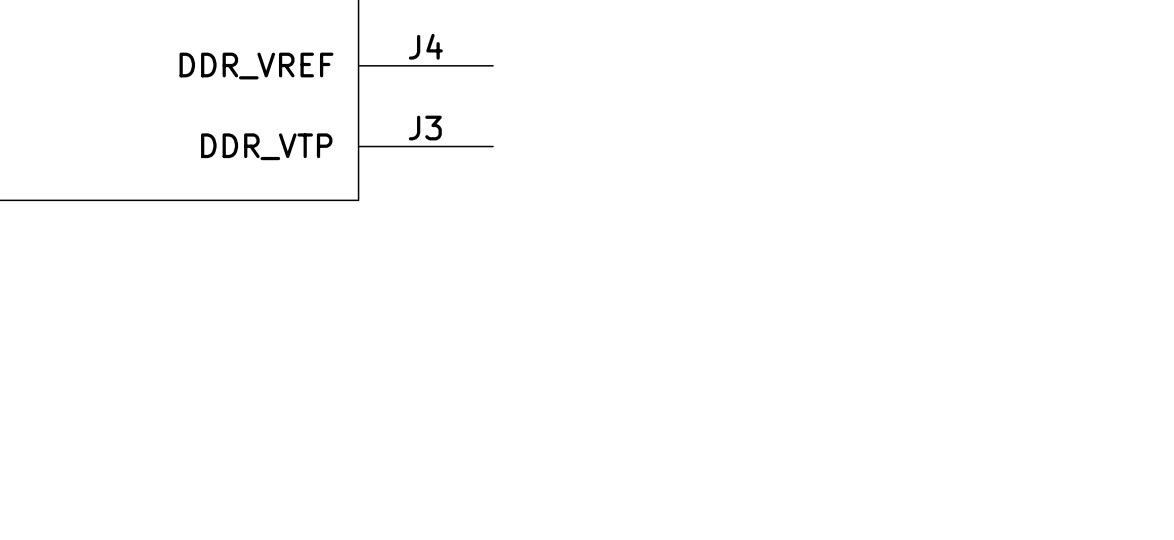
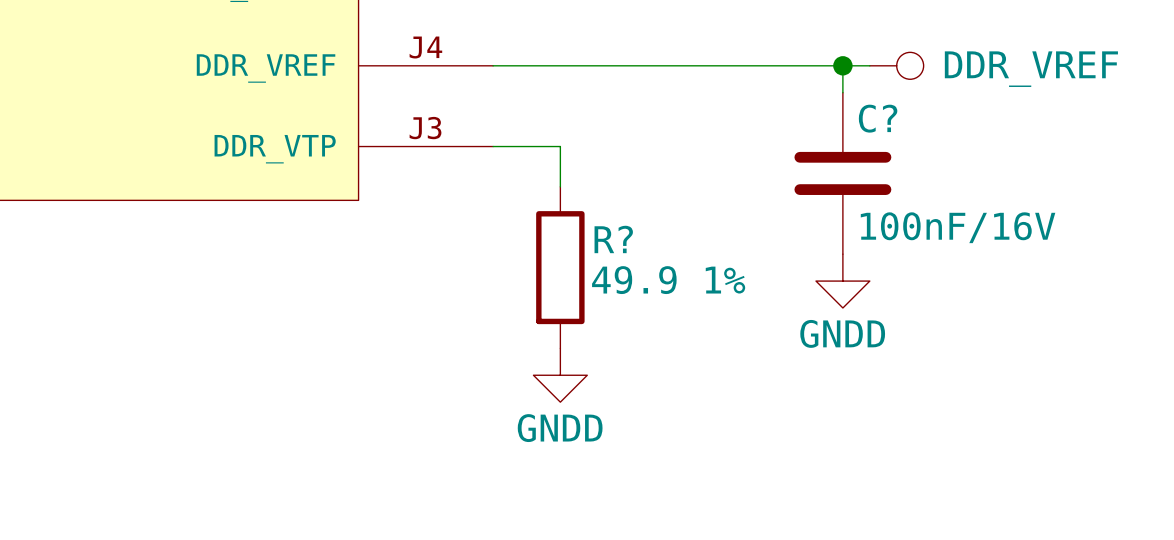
wire: none -> (493, 65) (869, 65)
wire: none -> (842, 65) (842, 92)
junction: none -> (842, 65)
power symbol: none -> DDR_VREF (896, 65)
wire: none -> (493, 146) (560, 146) (560, 186)
C?: none -> 100nF/16V (842, 173)
R?: none -> 49.9 1% (560, 267)
power symbol: none -> GNDD (842, 281)
power symbol: none -> GNDD (560, 375)

